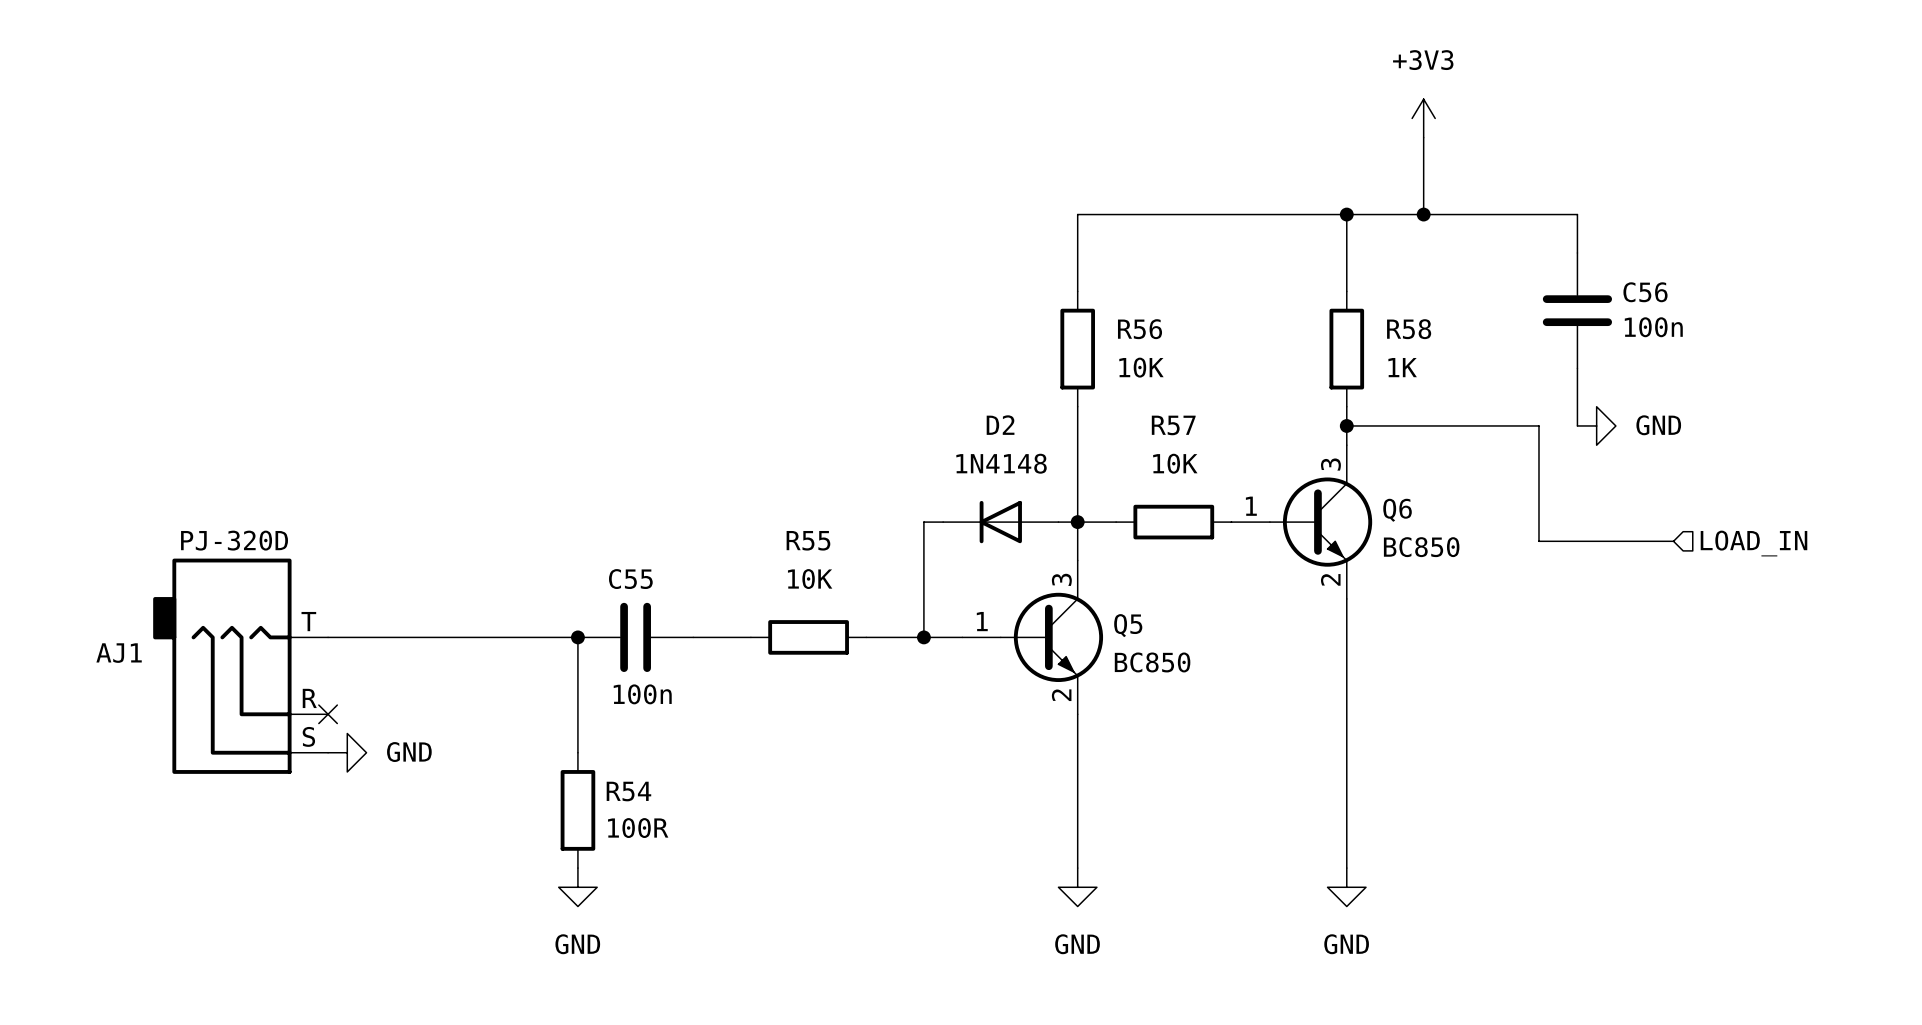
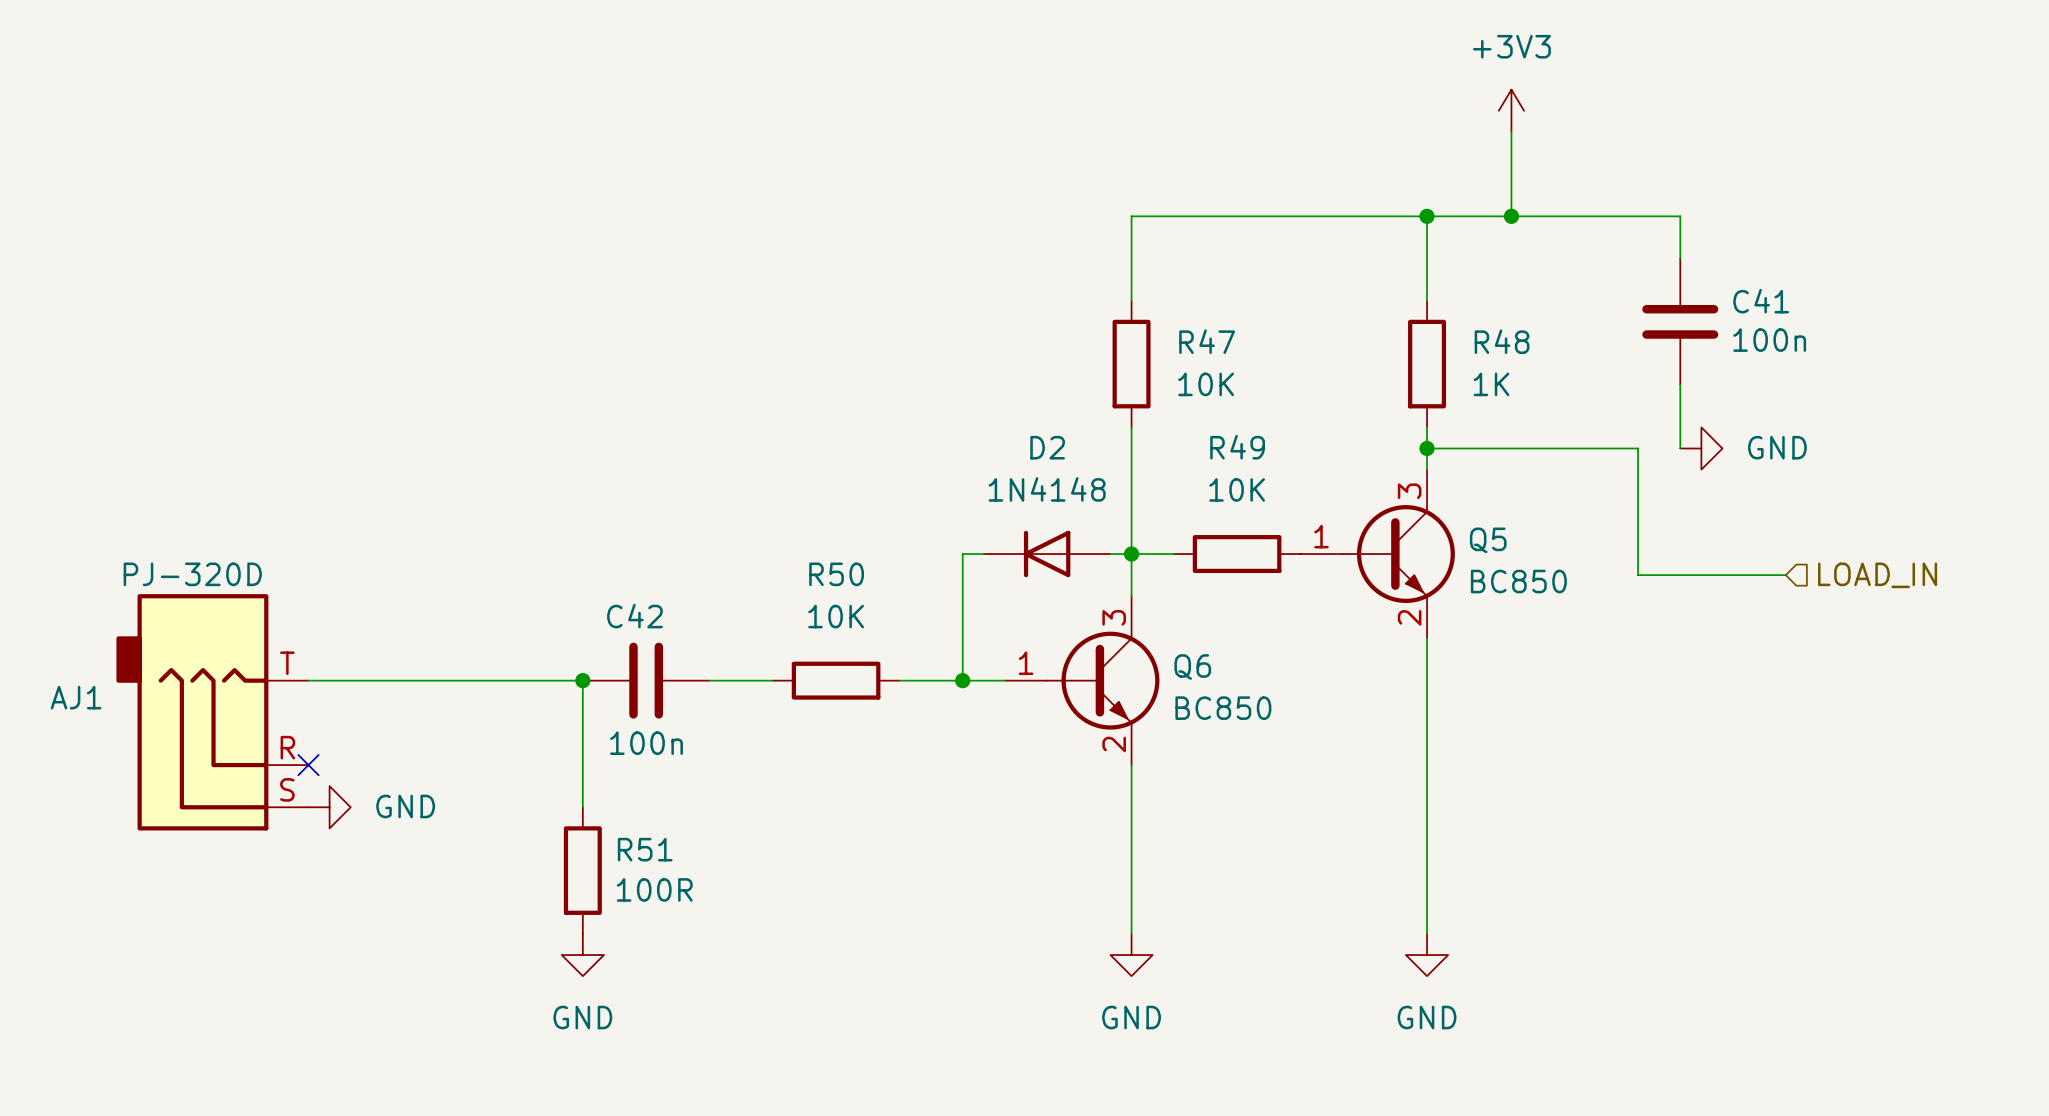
C56 name: C56 (1645, 292) -> C41 (1761, 301)
R56 name: R56 (1140, 329) -> R47 (1207, 341)
R58 name: R58 (1409, 329) -> R48 (1502, 341)
R57 name: R57 (1173, 425) -> R49 (1237, 447)
Q6 name: Q6 (1397, 510) -> Q5 (1488, 540)
R55 name: R55 (808, 540) -> R50 (836, 574)
C55 name: C55 (630, 579) -> C42 (634, 616)
Q5 name: Q5 (1128, 625) -> Q6 (1192, 667)
R54 name: R54 (628, 791) -> R51 (645, 849)

